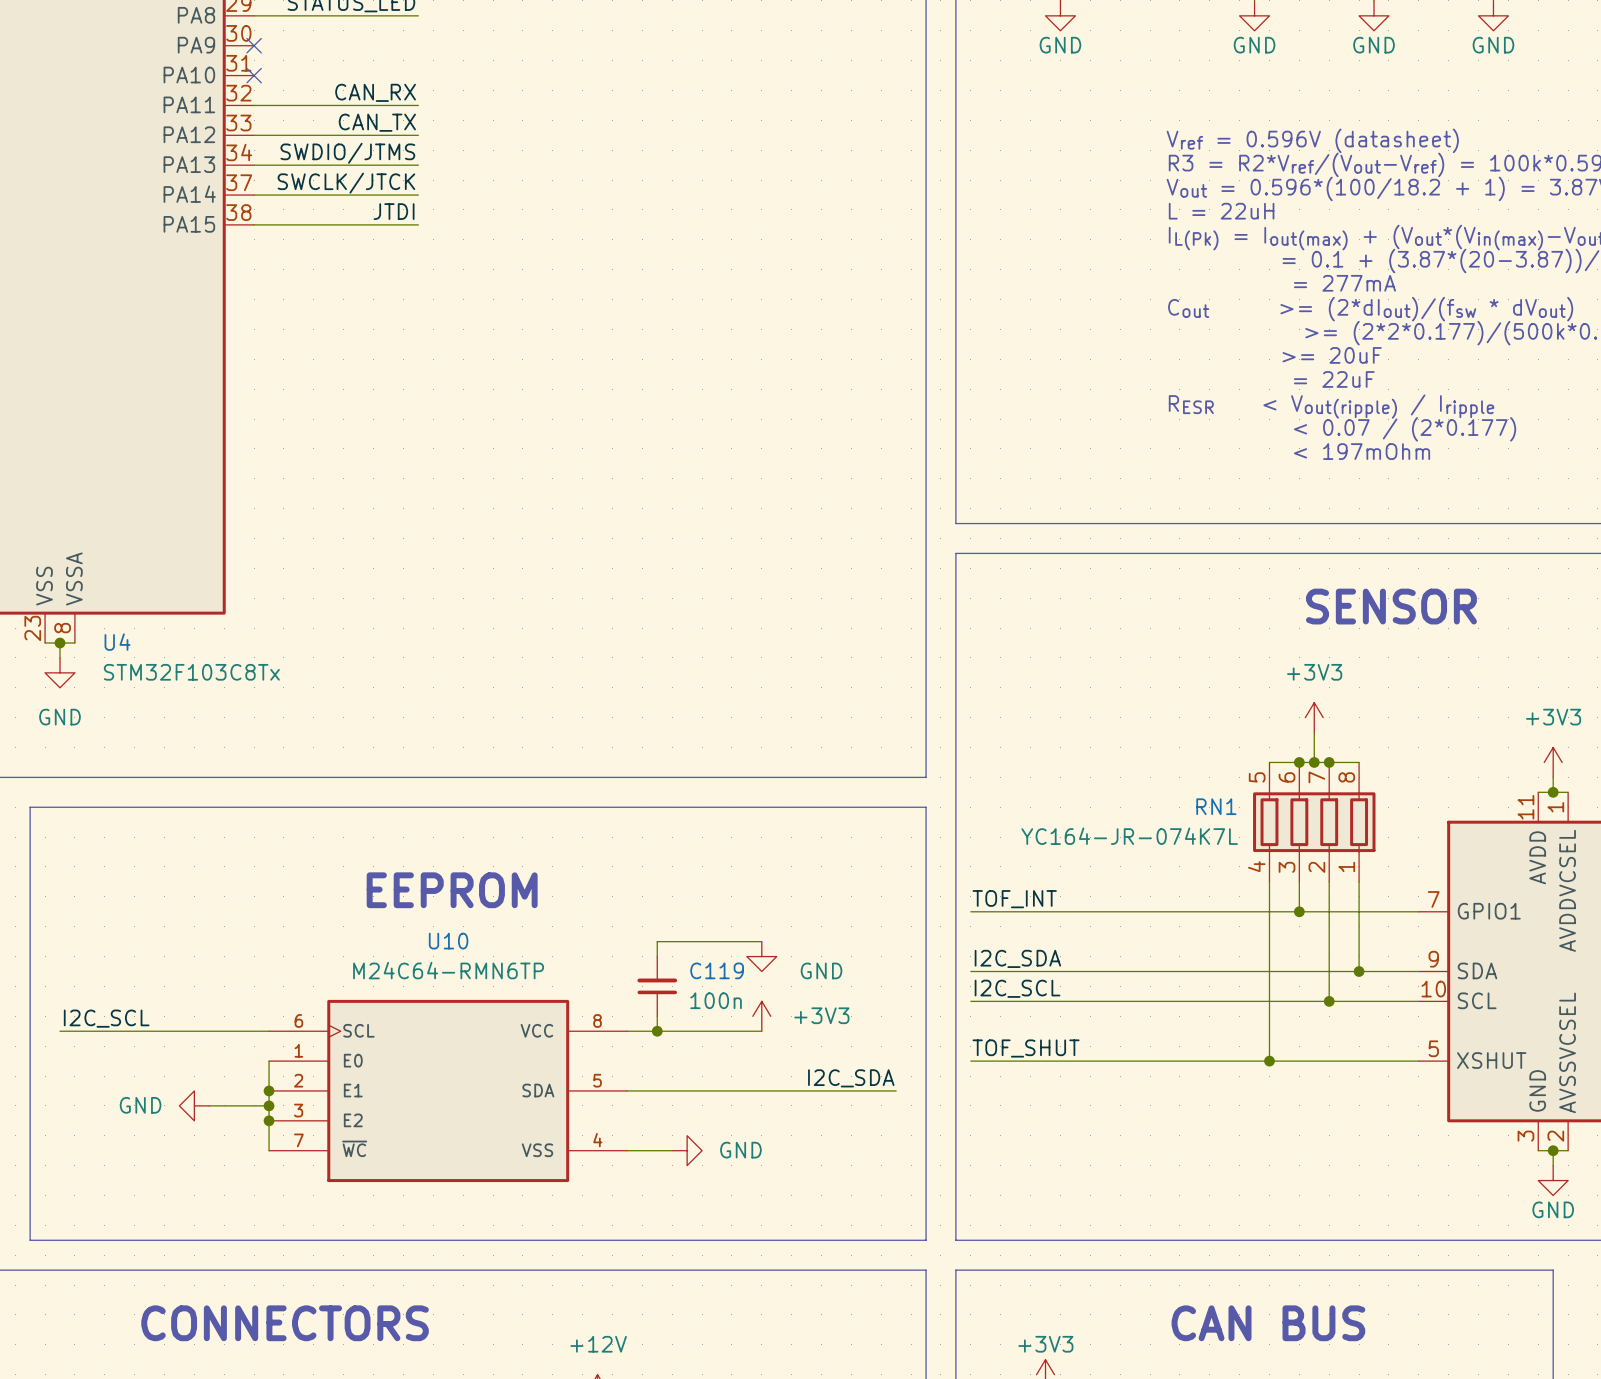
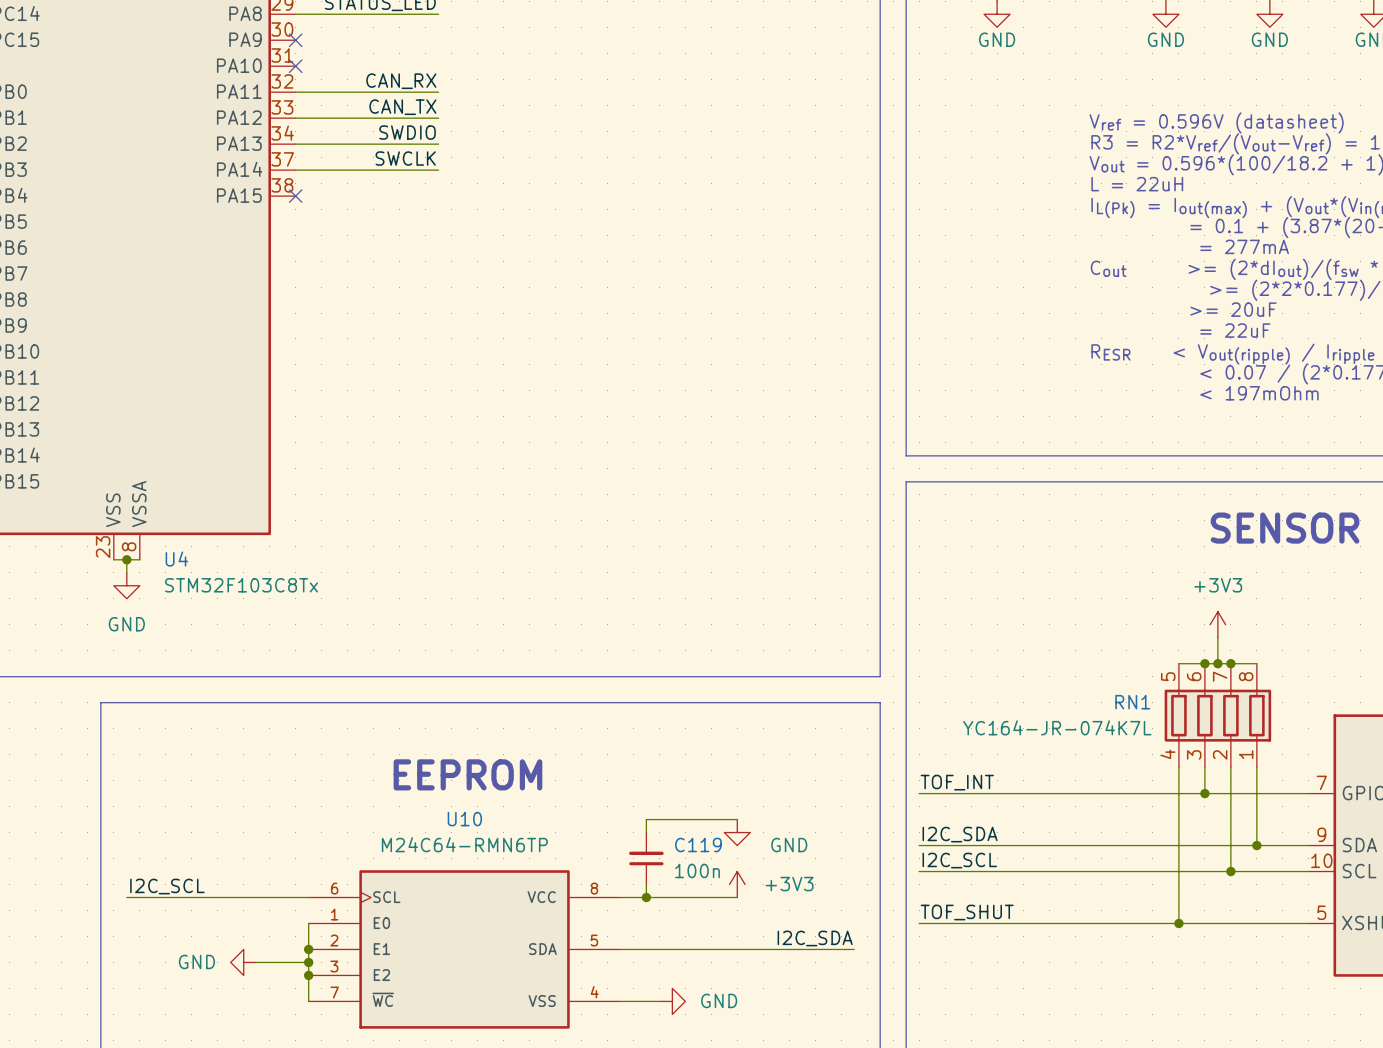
label: SWDIO/JTMS (347, 153) -> SWDIO (407, 132)
label: SWCLK/JTCK (346, 183) -> SWCLK (405, 158)
label: JTDI (394, 211) -> none
wire: (254, 224) (418, 224) -> none
no-connect mark: none -> (295, 196)

